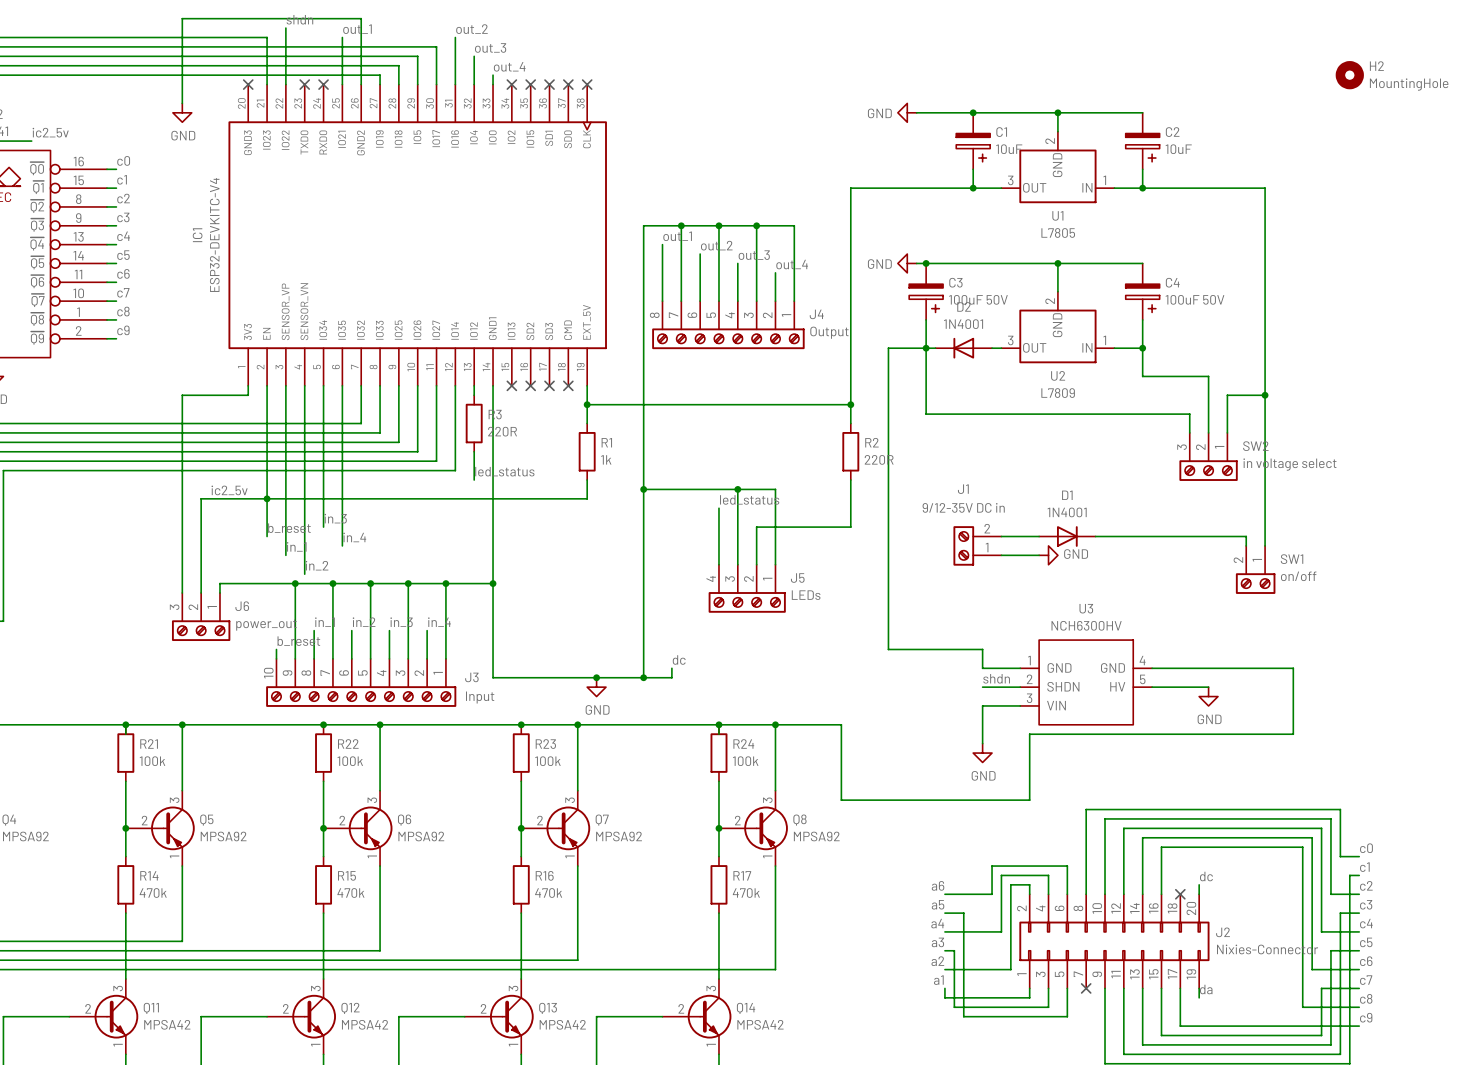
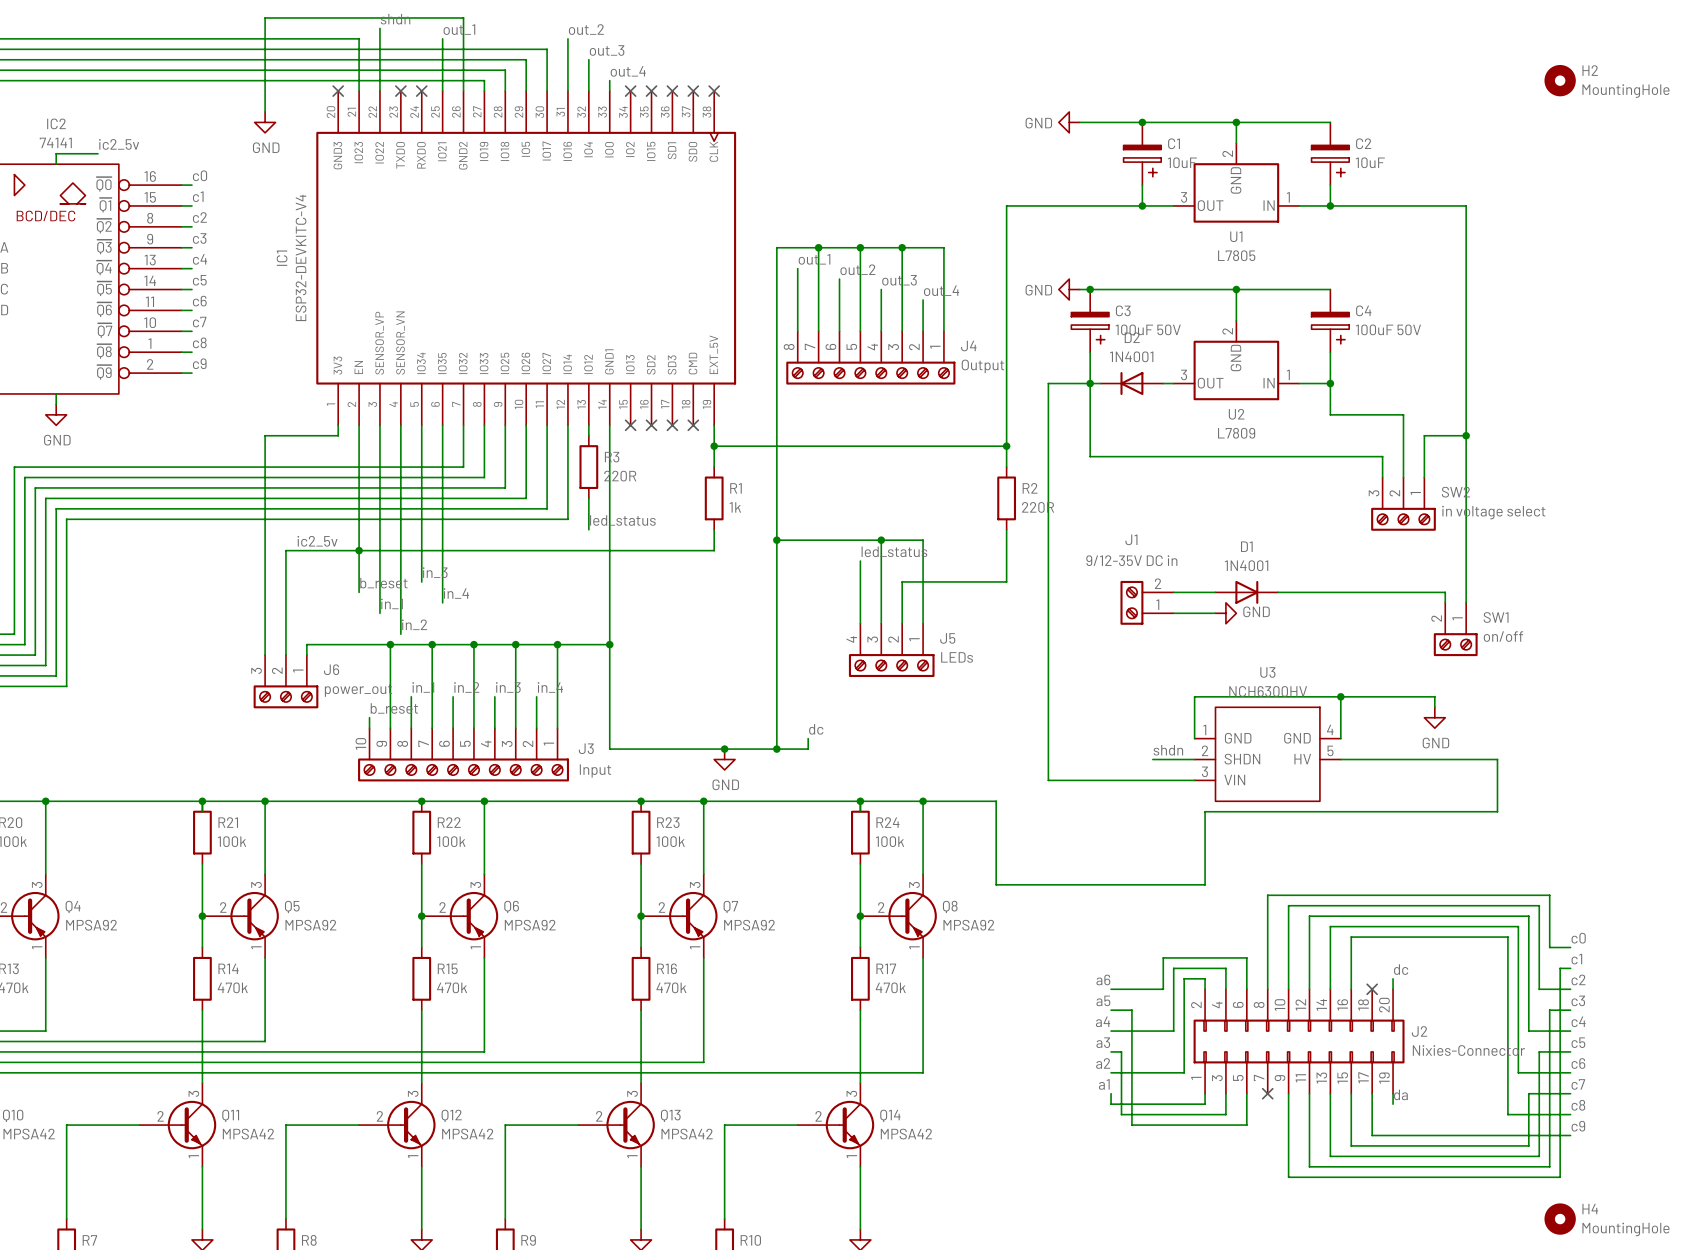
wire: none -> (1340, 696) (1340, 738)
junction: none -> (1340, 696)
wire: none -> (1434, 707) (1434, 696) (1194, 696) (1194, 738)
wire: (888, 649) (982, 649) (982, 668) (1020, 668) -> (1048, 717) (1048, 780) (1152, 780)
wire: (1152, 668) (1293, 668) (1293, 687) -> (1403, 759) (1497, 759)
power symbol position: GND (1208, 696) -> GND (1434, 717)
wire: (982, 705) (982, 743) -> none
power symbol: GND (982, 753) -> none

